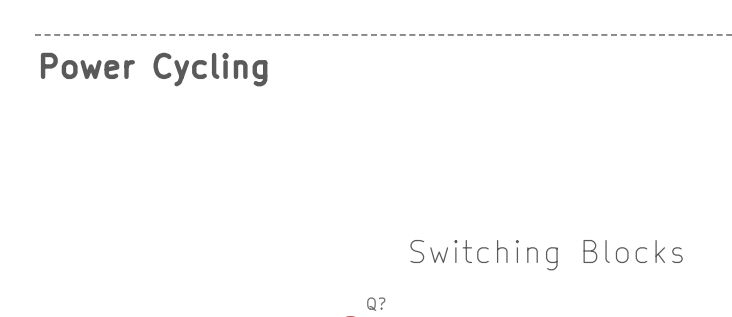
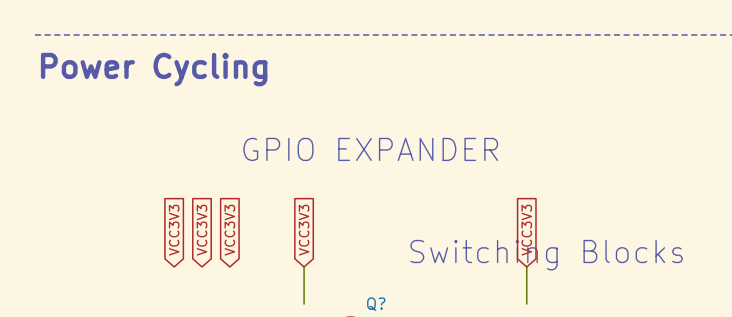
text: none -> GPIO EXPANDER (370, 149)
global label: none -> VCC3V3 (174, 230)
global label: none -> VCC3V3 (202, 230)
global label: none -> VCC3V3 (229, 230)
global label: none -> VCC3V3 (304, 230)
global label: none -> VCC3V3 (526, 230)
wire: none -> (304, 266) (304, 304)
wire: none -> (526, 266) (526, 304)

